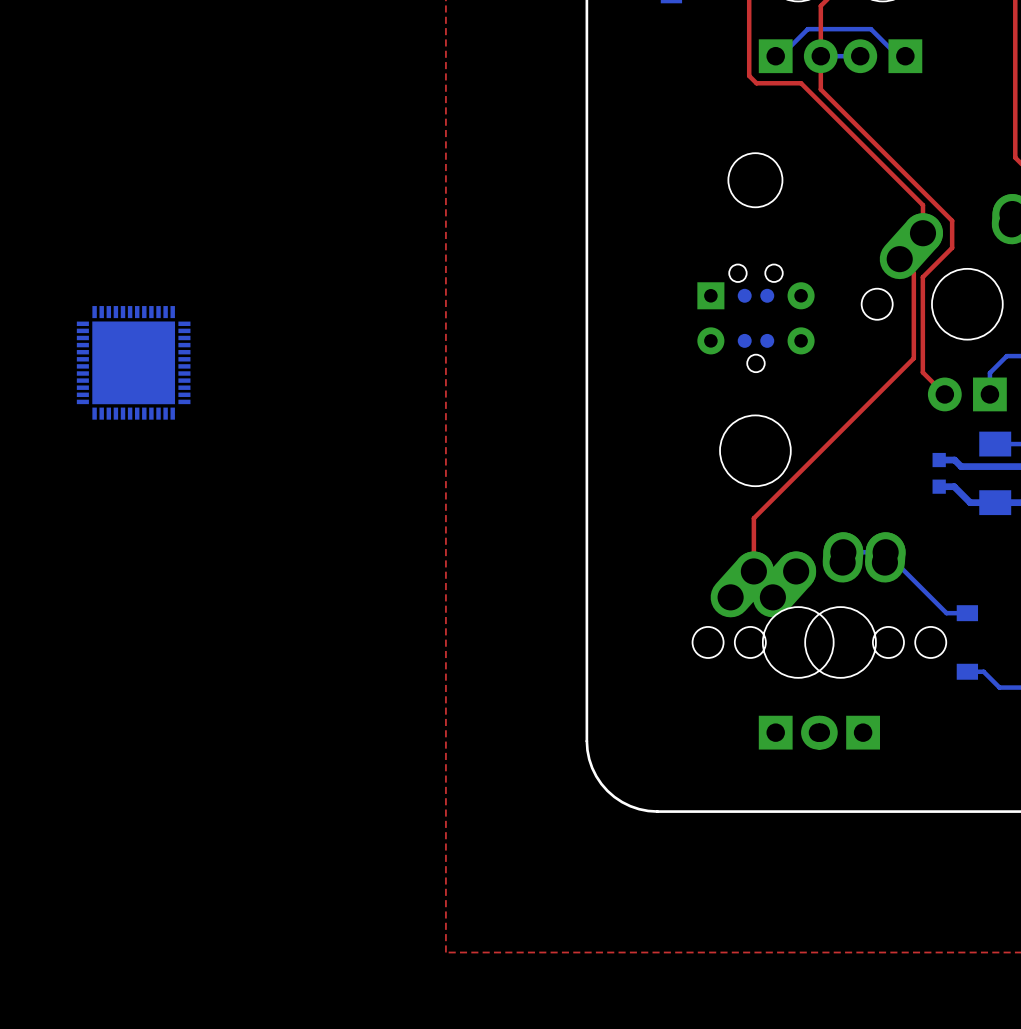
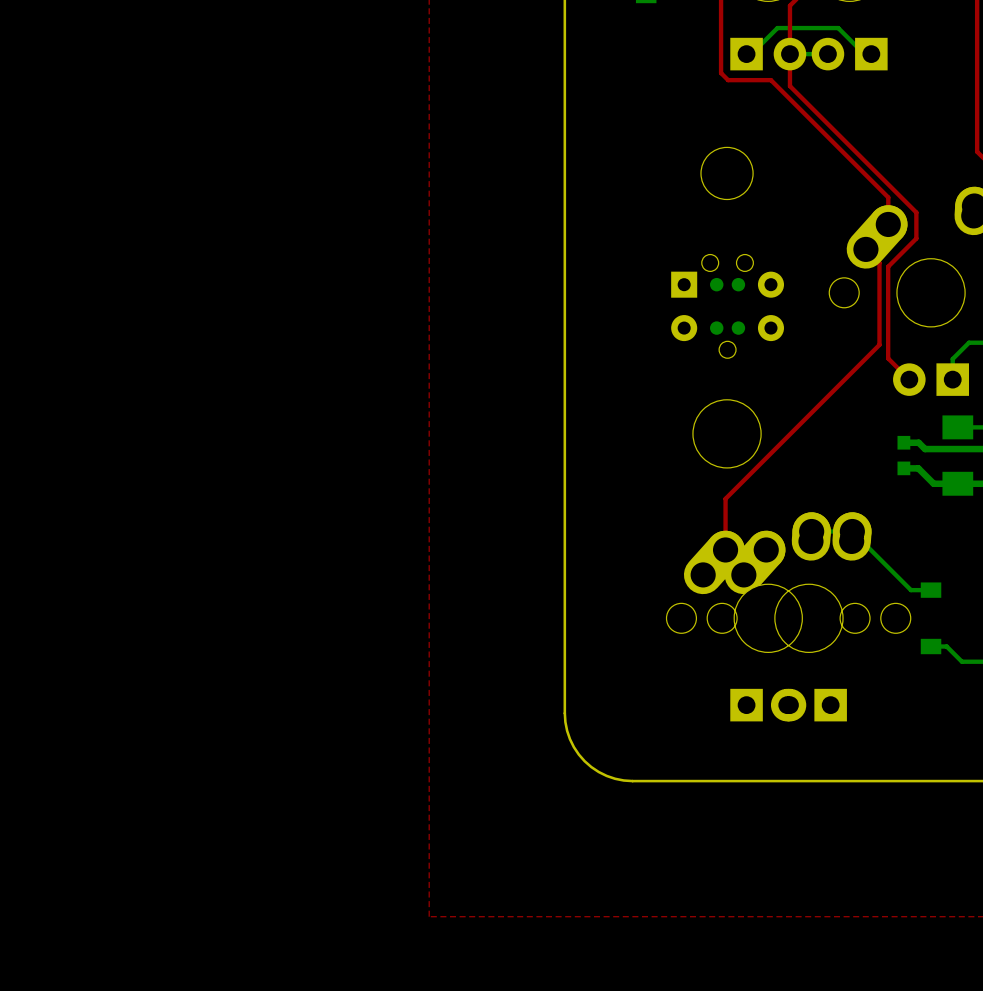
part: (133, 362) -> none

